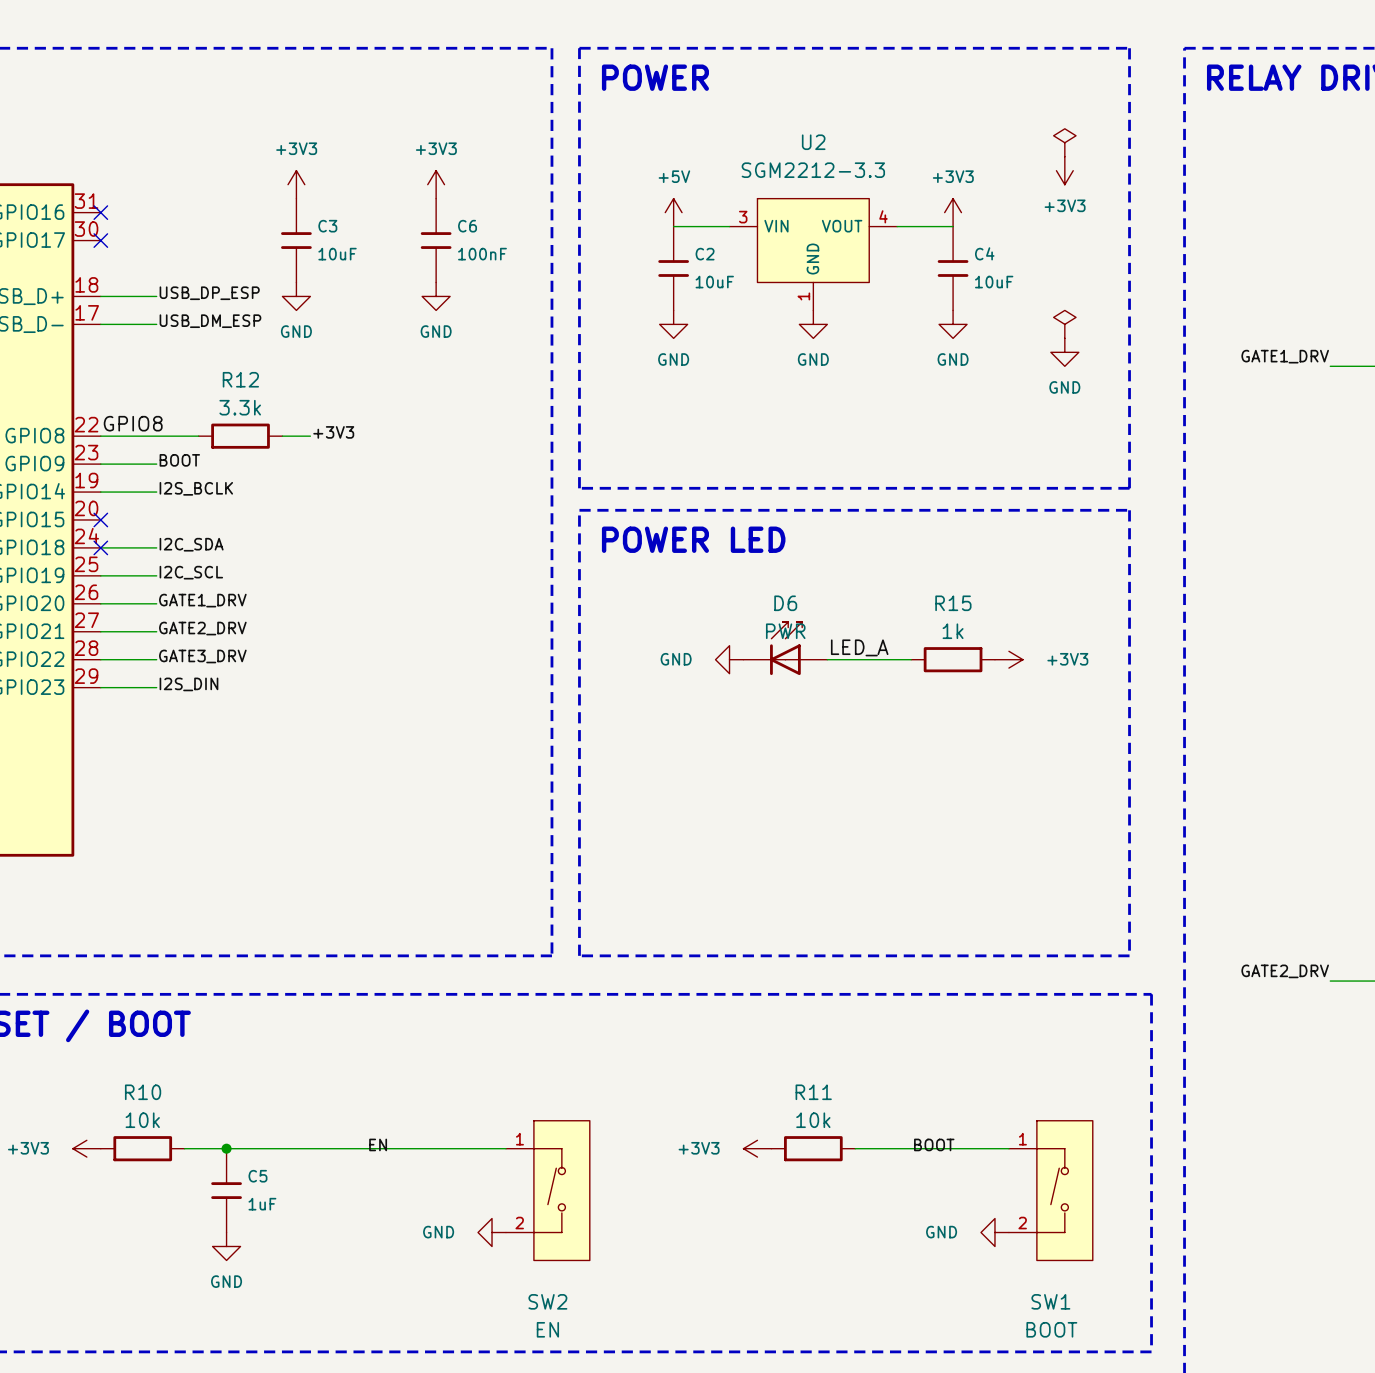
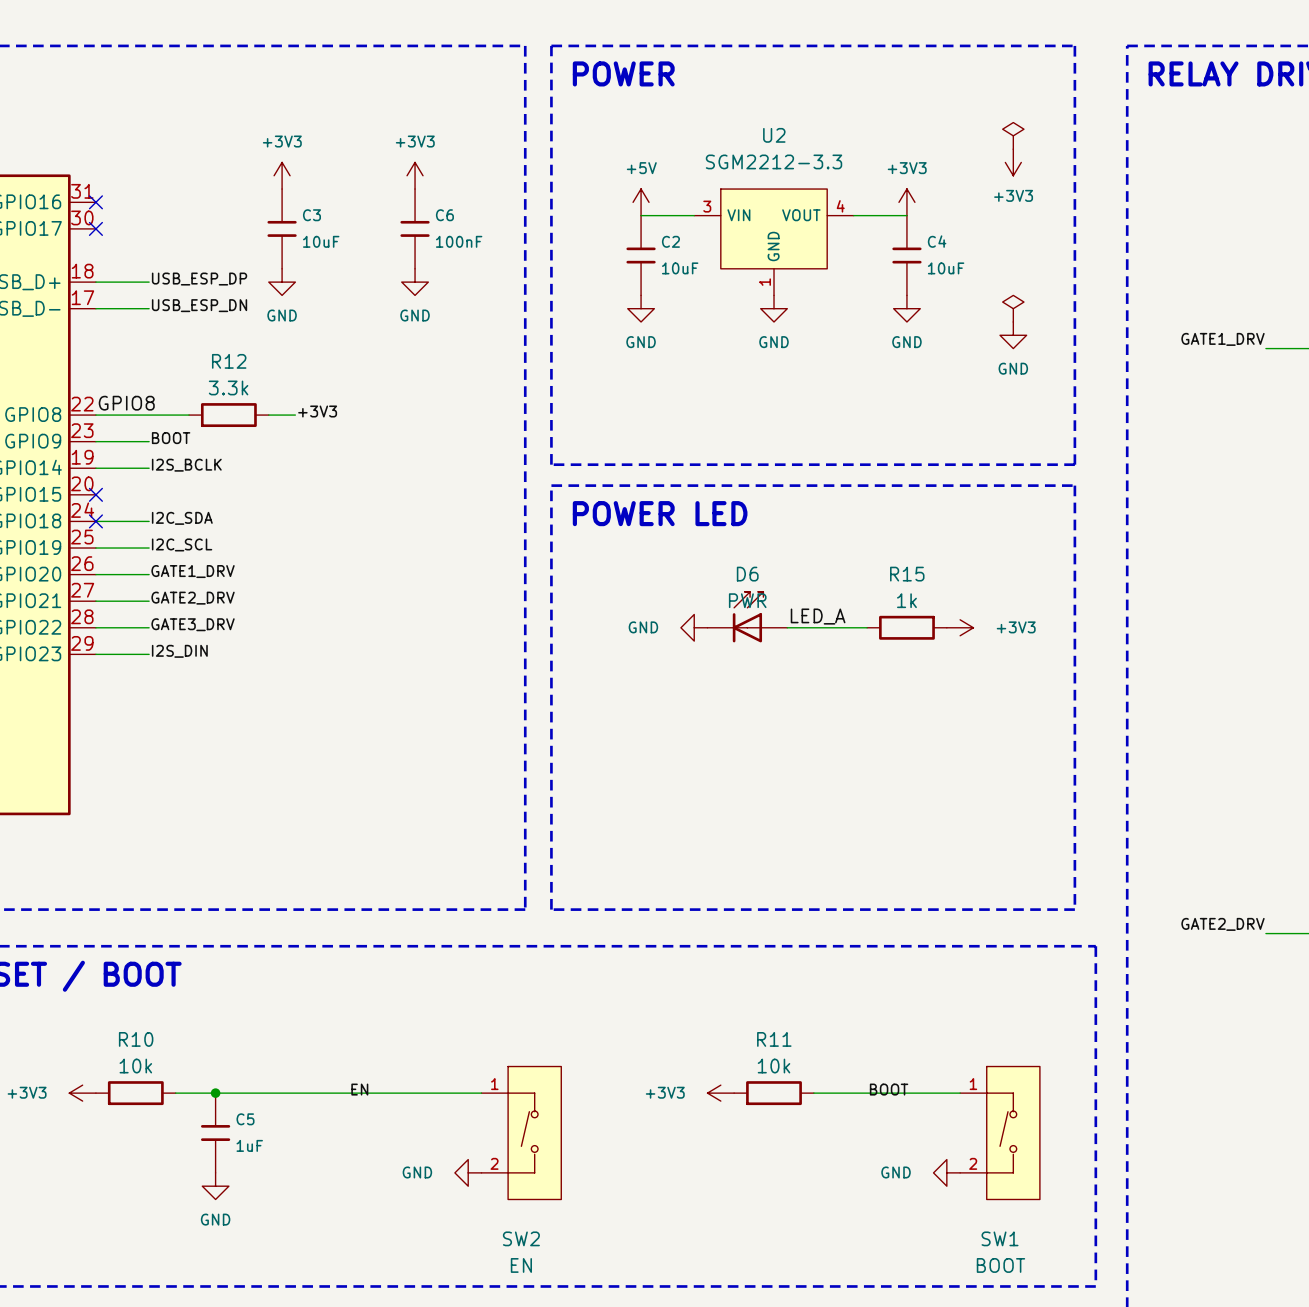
label: USB_DP_ESP (209, 293) -> USB_ESP_DP (199, 279)
label: USB_DM_ESP (210, 321) -> USB_ESP_DN (199, 305)

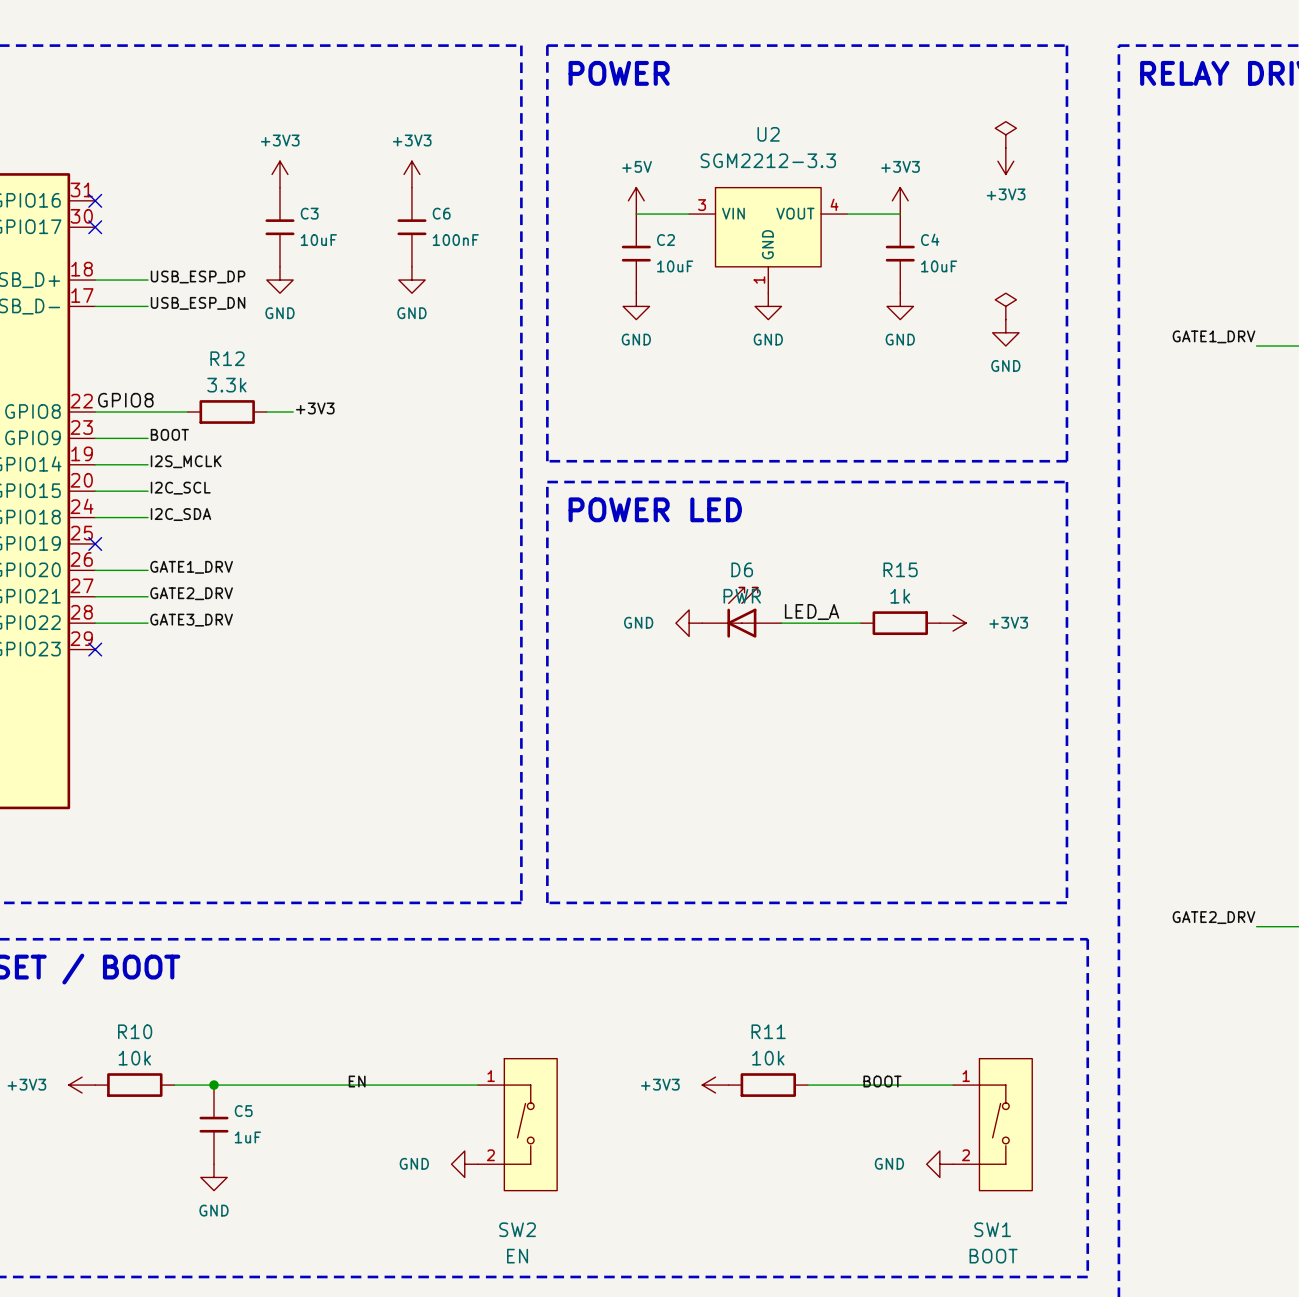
label: I2S_BCLK (186, 465) -> I2S_MCLK (186, 461)
no-connect mark: (95, 494) -> none
no-connect mark: (95, 521) -> none
label position: I2C_SCL (182, 544) -> I2C_SCL (180, 488)
wire: (95, 548) (149, 548) -> (95, 491) (148, 491)
no-connect mark: none -> (95, 543)
label: I2S_DIN (179, 651) -> none
wire: (95, 654) (149, 654) -> none
no-connect mark: none -> (95, 649)

